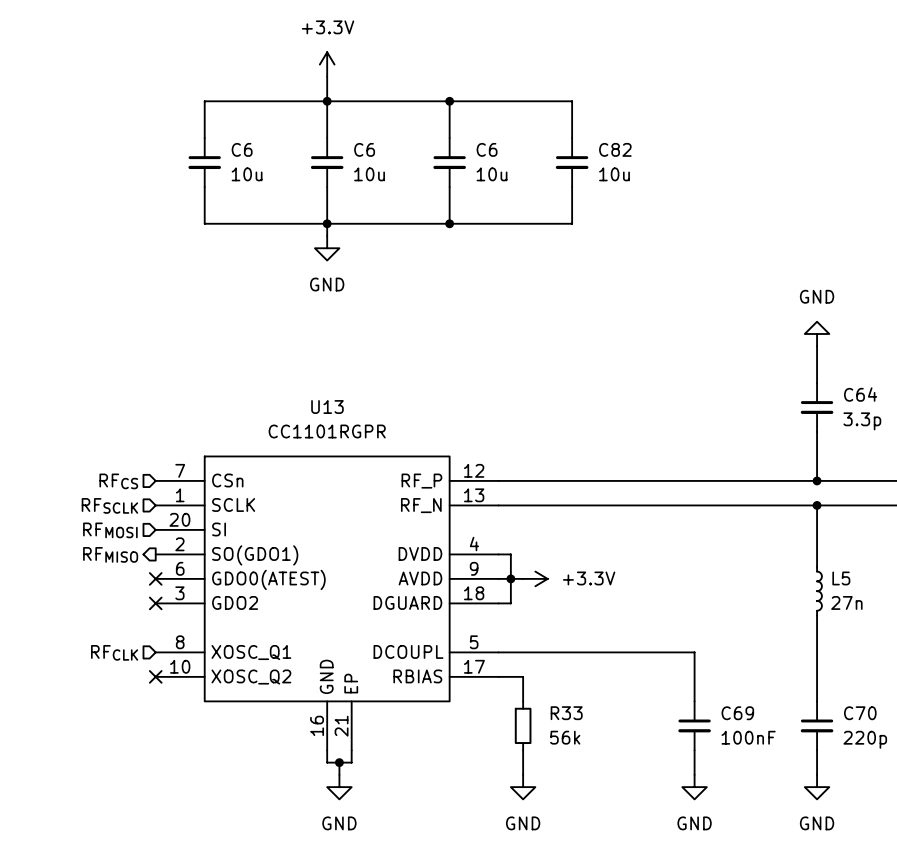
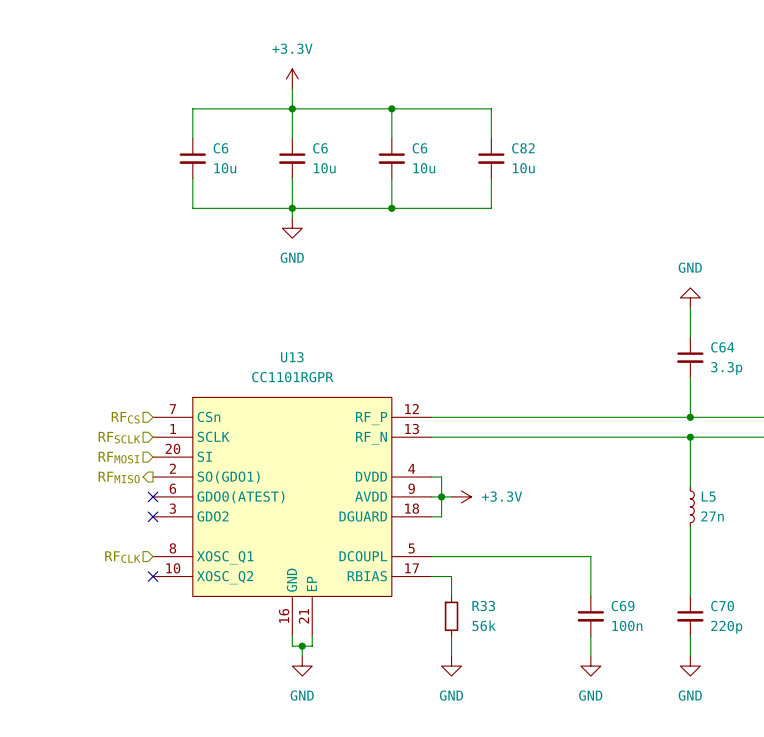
C69 value: 100nF (748, 737) -> 100n (627, 625)

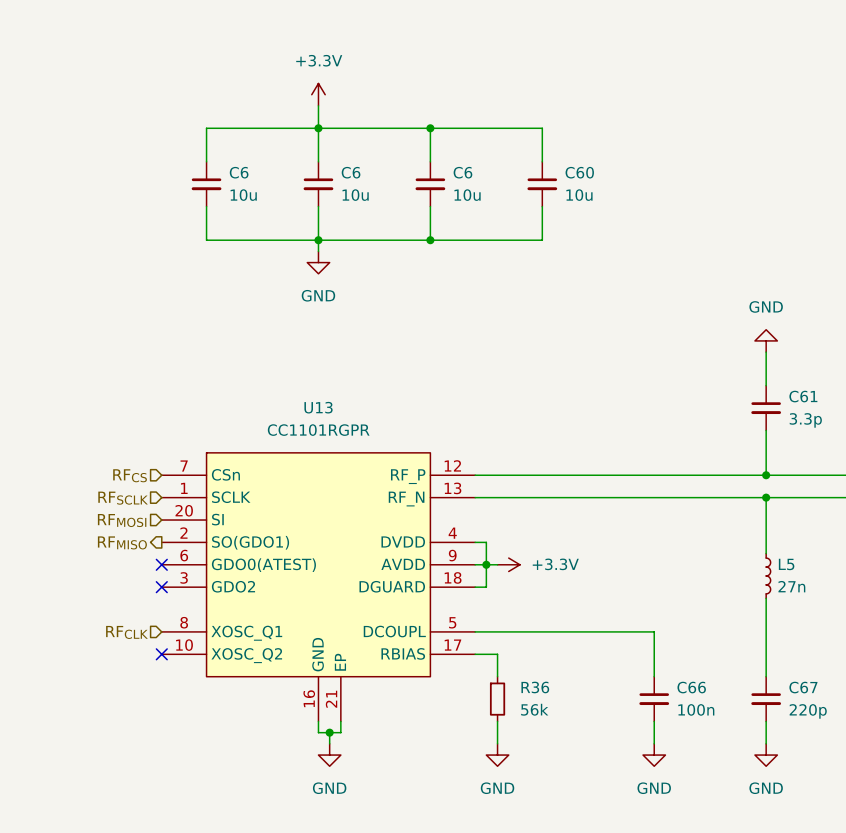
C82 name: C82 (523, 148) -> C60 (579, 172)
C64 name: C64 (722, 347) -> C61 (803, 396)
R33 name: R33 (483, 606) -> R36 (535, 687)
C69 name: C69 (623, 606) -> C66 (691, 687)
C70 name: C70 (722, 606) -> C67 (803, 687)

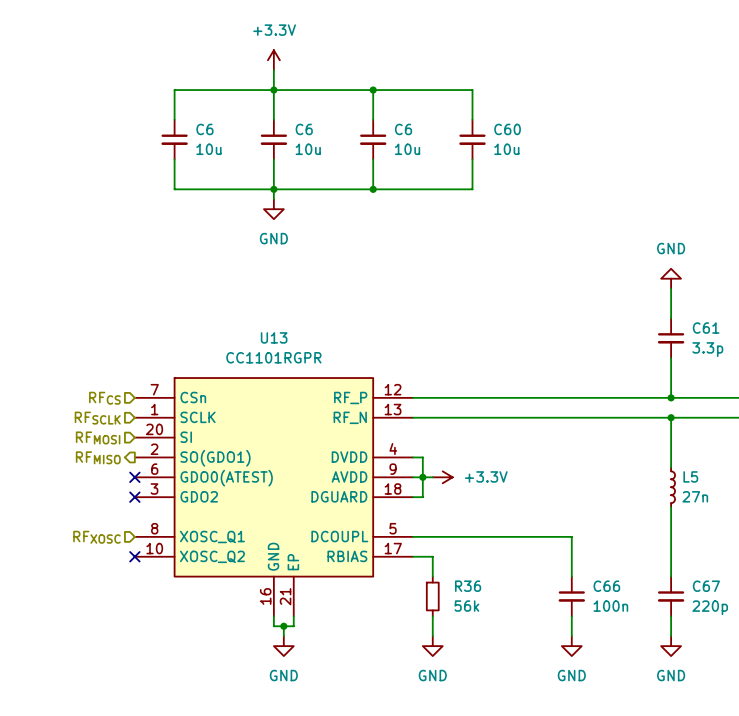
hierarchical label: RFCLK (126, 632) -> RFXOSC (96, 537)

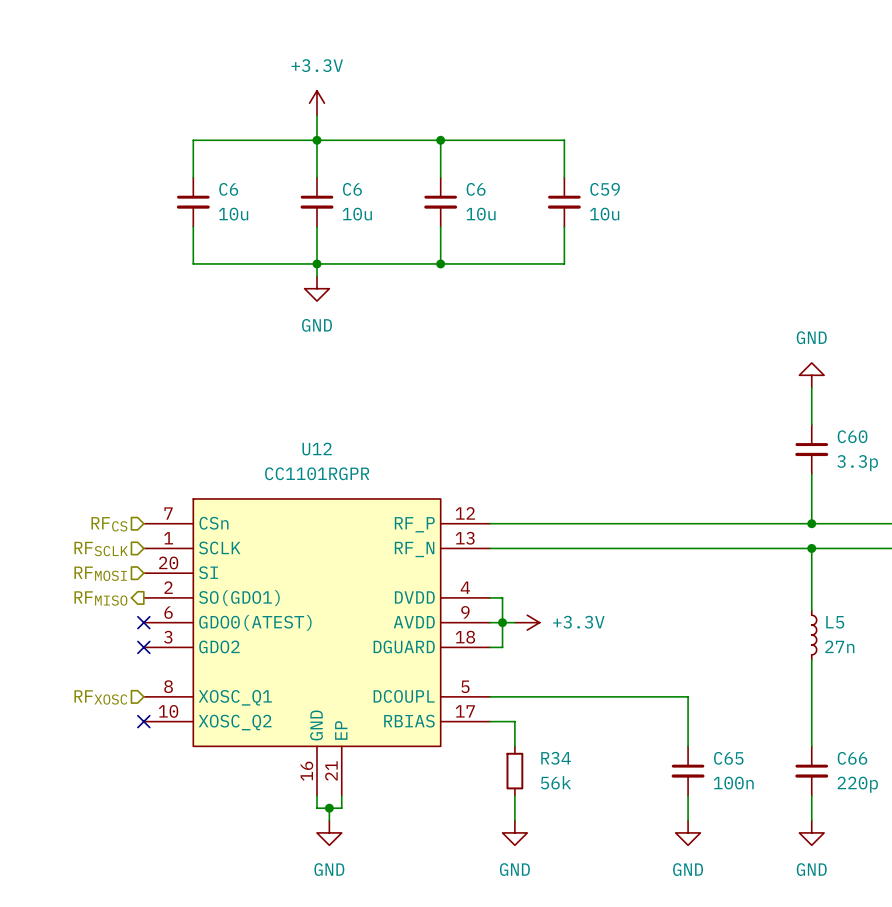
C60 name: C60 (507, 129) -> C59 (605, 189)
C61 name: C61 (706, 328) -> C60 (852, 436)
U13 name: U13 (274, 337) -> U12 (317, 449)
R36 name: R36 (468, 586) -> R34 (556, 758)
C66 name: C66 (606, 586) -> C65 (728, 758)
C67 name: C67 (706, 586) -> C66 (852, 758)

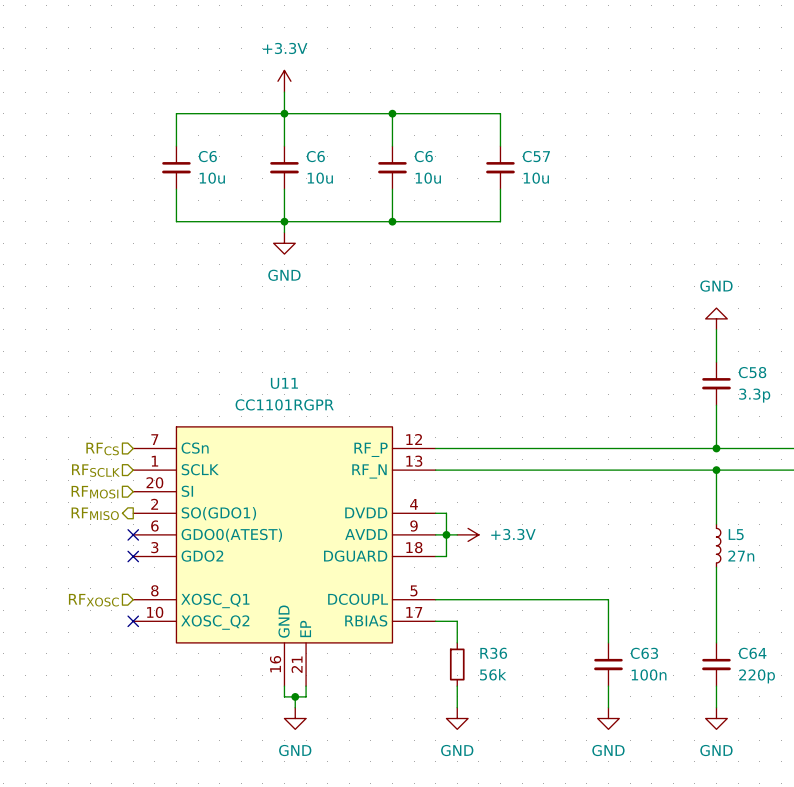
C59 name: C59 (605, 189) -> C57 (536, 156)
C60 name: C60 (852, 436) -> C58 (752, 372)
U12 name: U12 (317, 449) -> U11 (284, 383)
R34 name: R34 (556, 758) -> R36 (493, 653)
C65 name: C65 (728, 758) -> C63 (644, 653)
C66 name: C66 (852, 758) -> C64 (752, 653)

